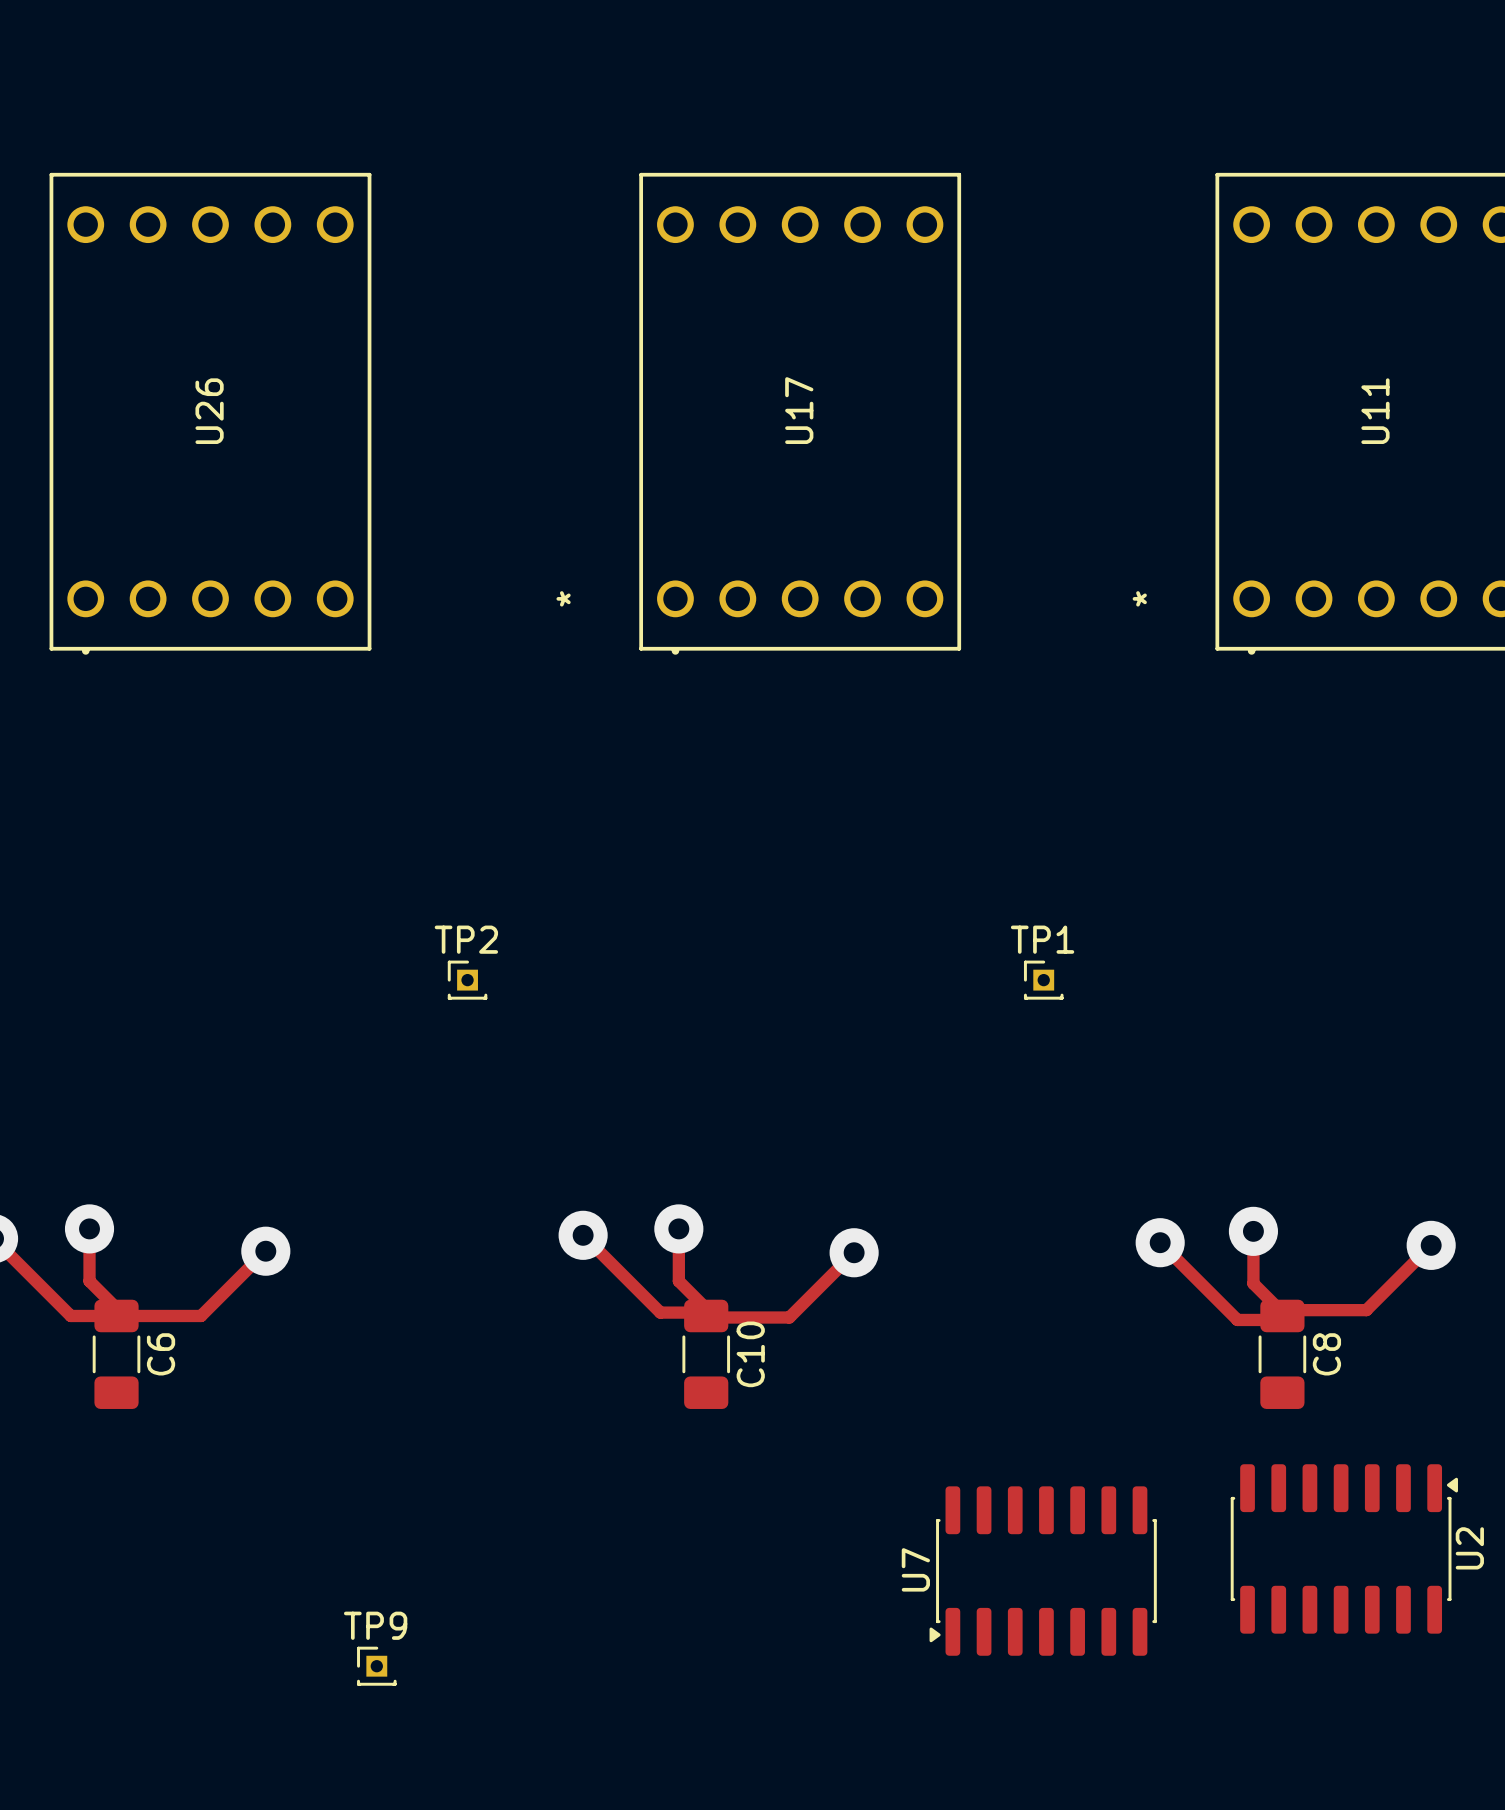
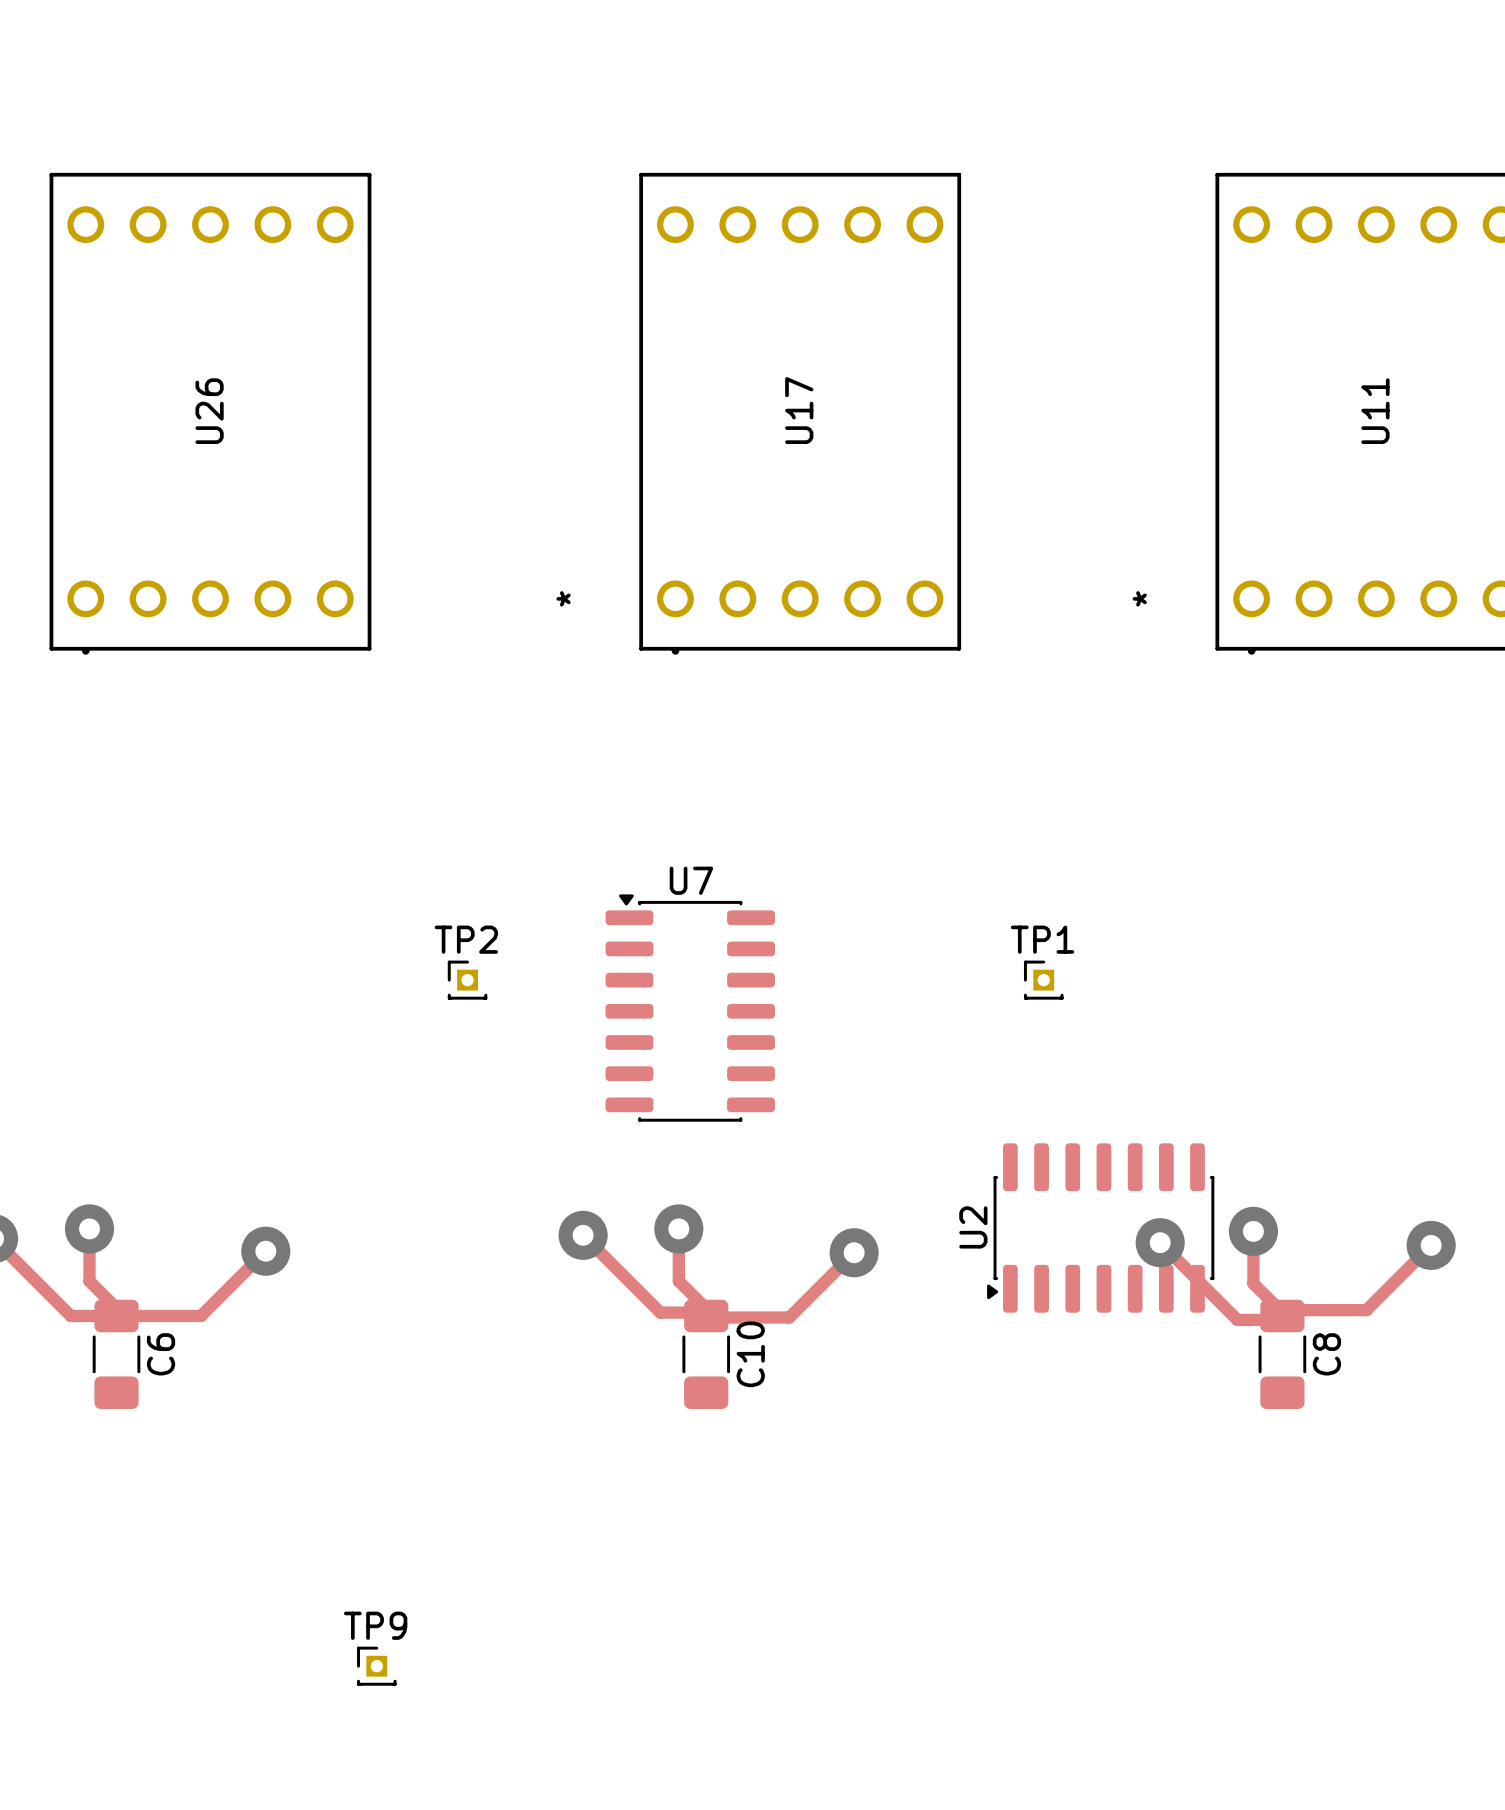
U2 rotation: 0° (1344, 1548) -> 180° (1100, 1228)
U2 position: (1344, 1548) -> (1100, 1228)
U7 rotation: 0° (1043, 1571) -> 90° clockwise (690, 1008)
U7 position: (1043, 1571) -> (690, 1008)

